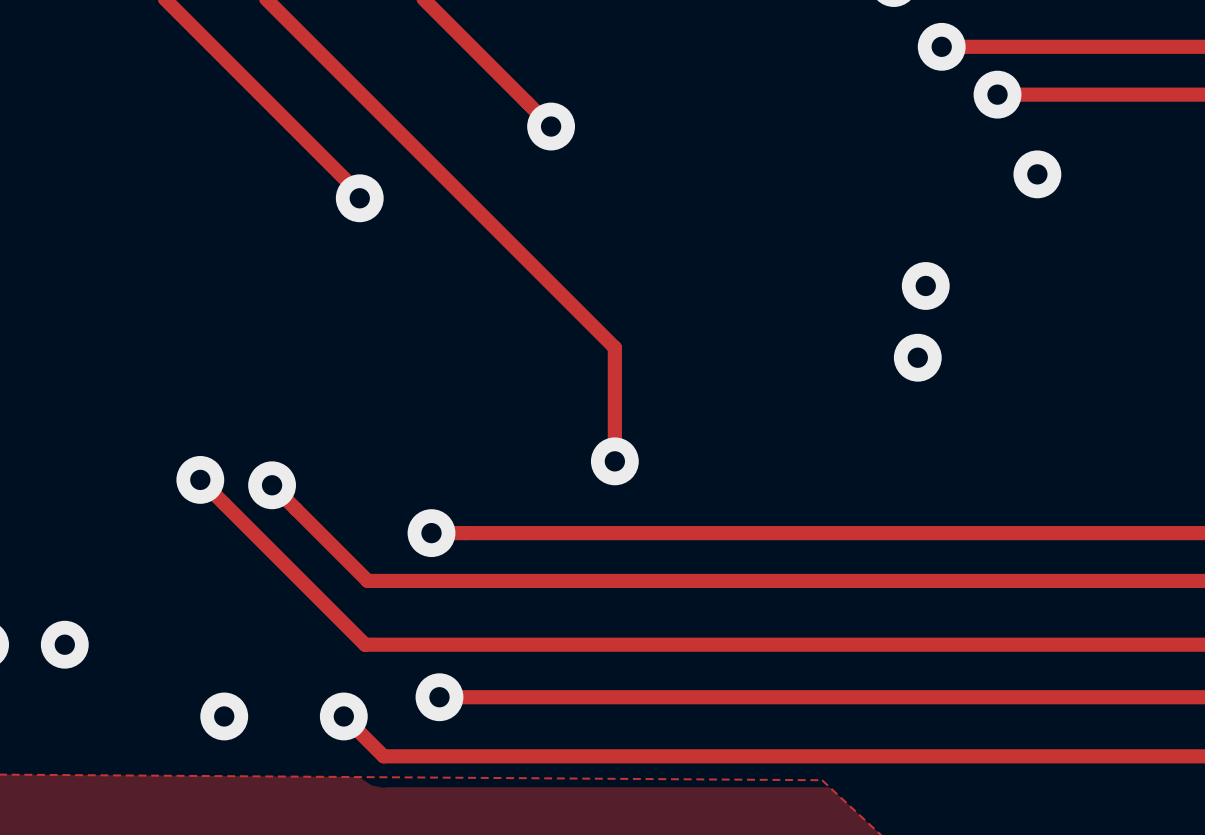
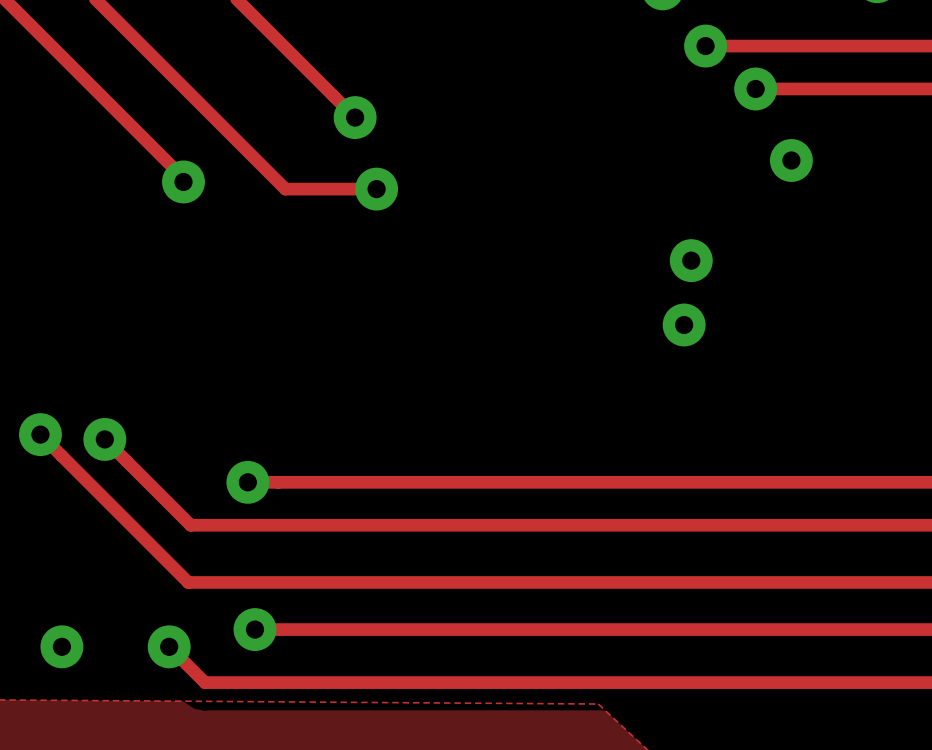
track: (473, 206) (614, 347) (614, 461) -> (285, 189) (376, 189)
via position: (614, 461) -> (376, 189)

